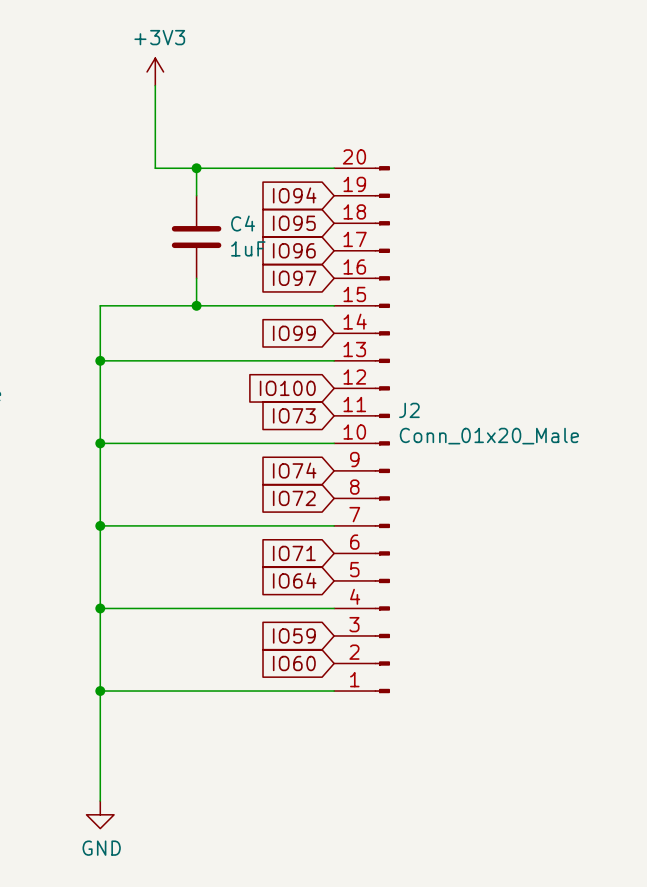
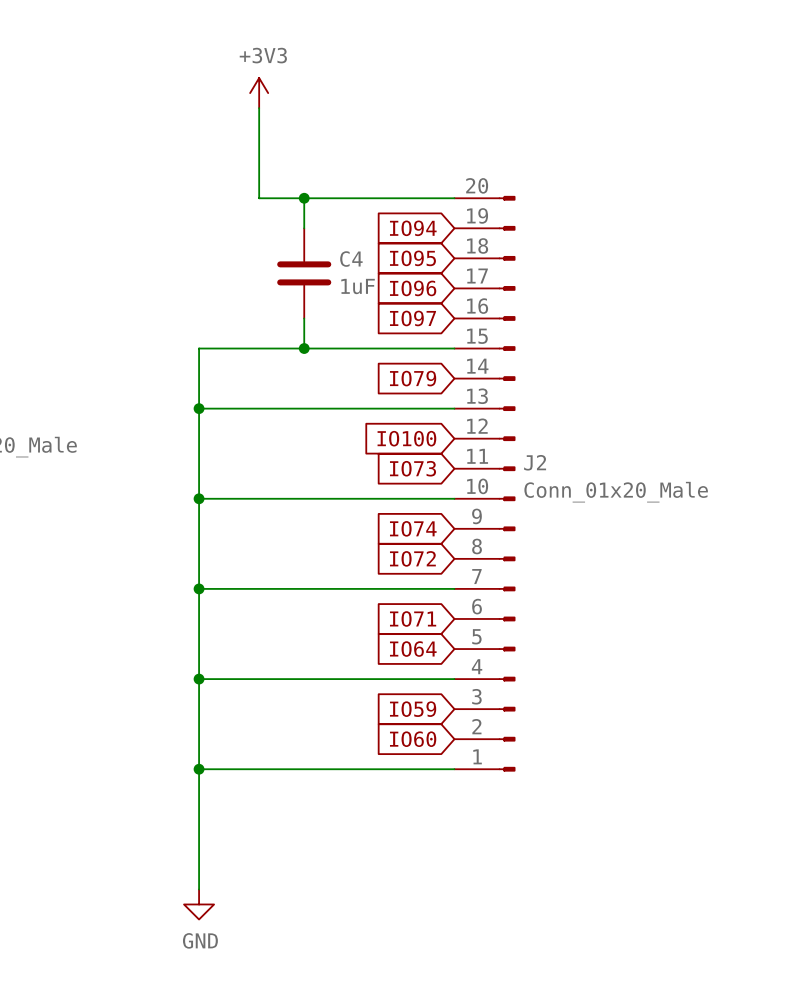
global label: IO99 (294, 333) -> IO79 (413, 378)

